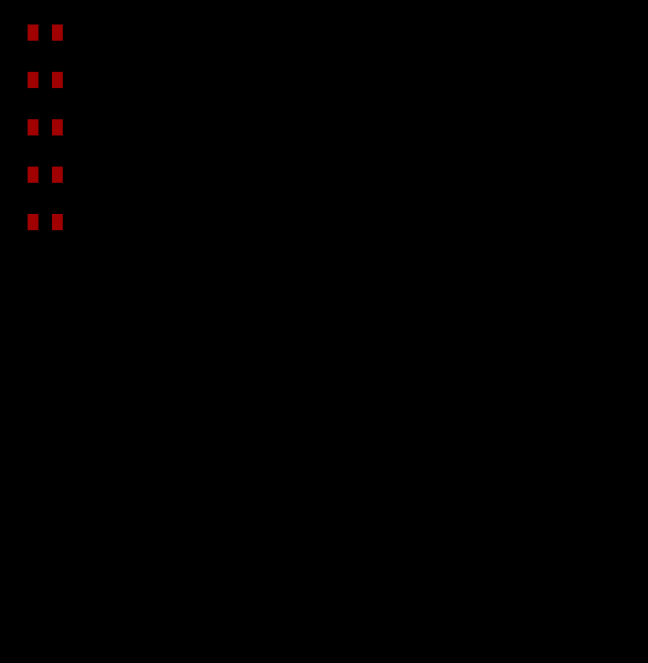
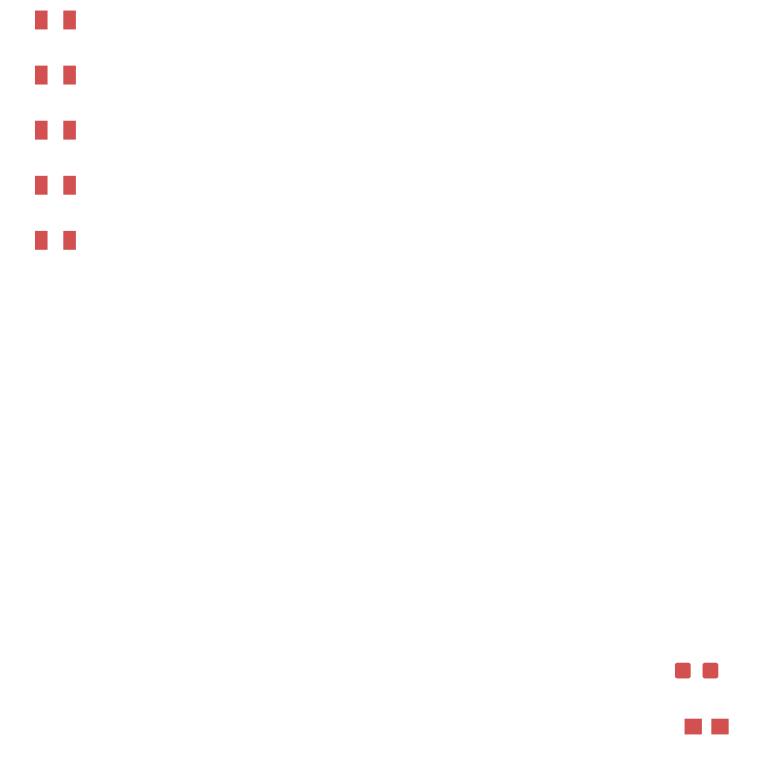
part: none -> (696, 670)
part: none -> (706, 726)

